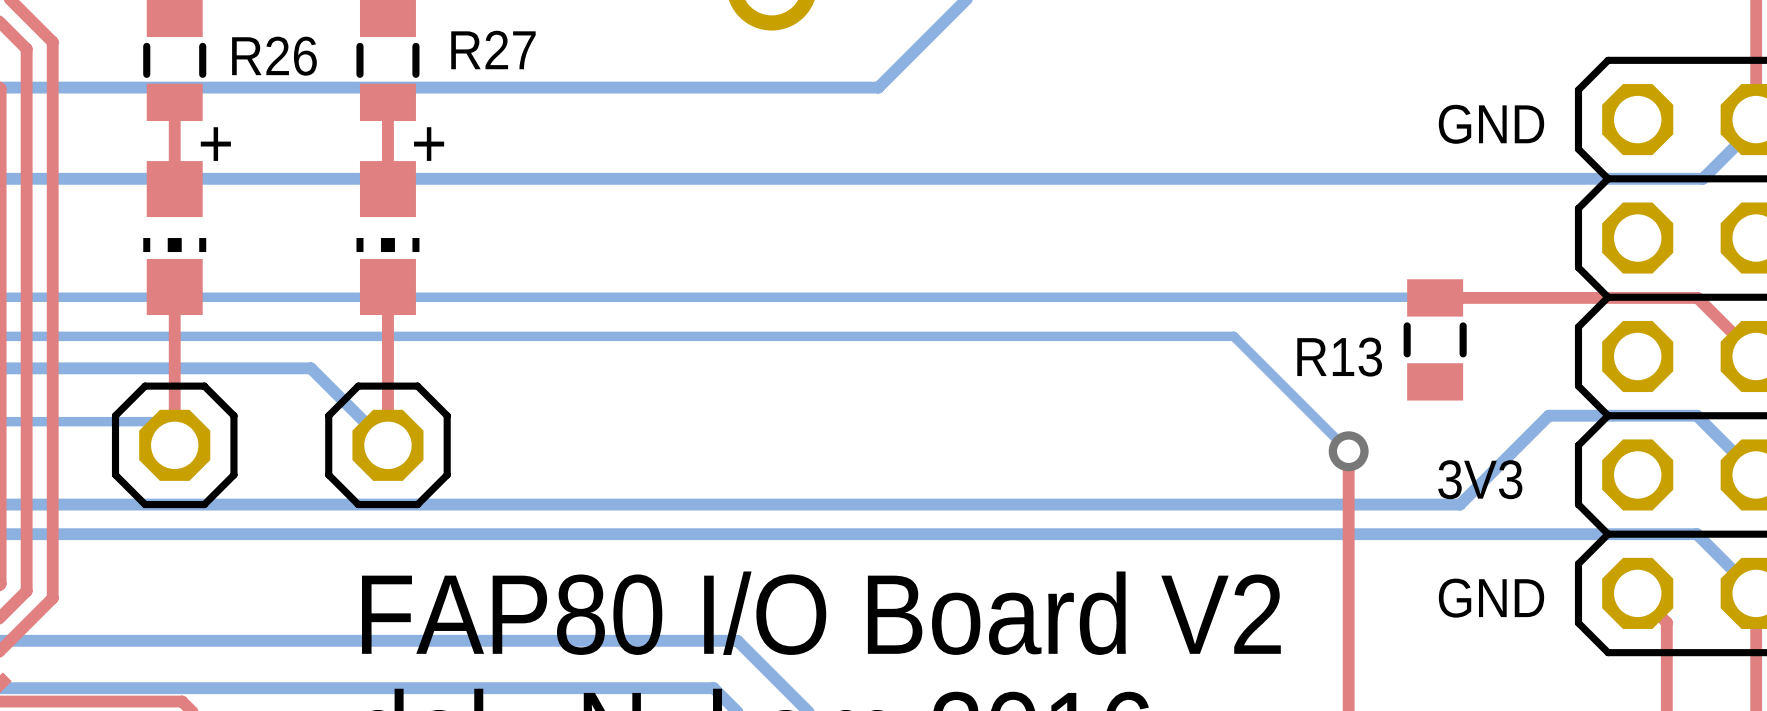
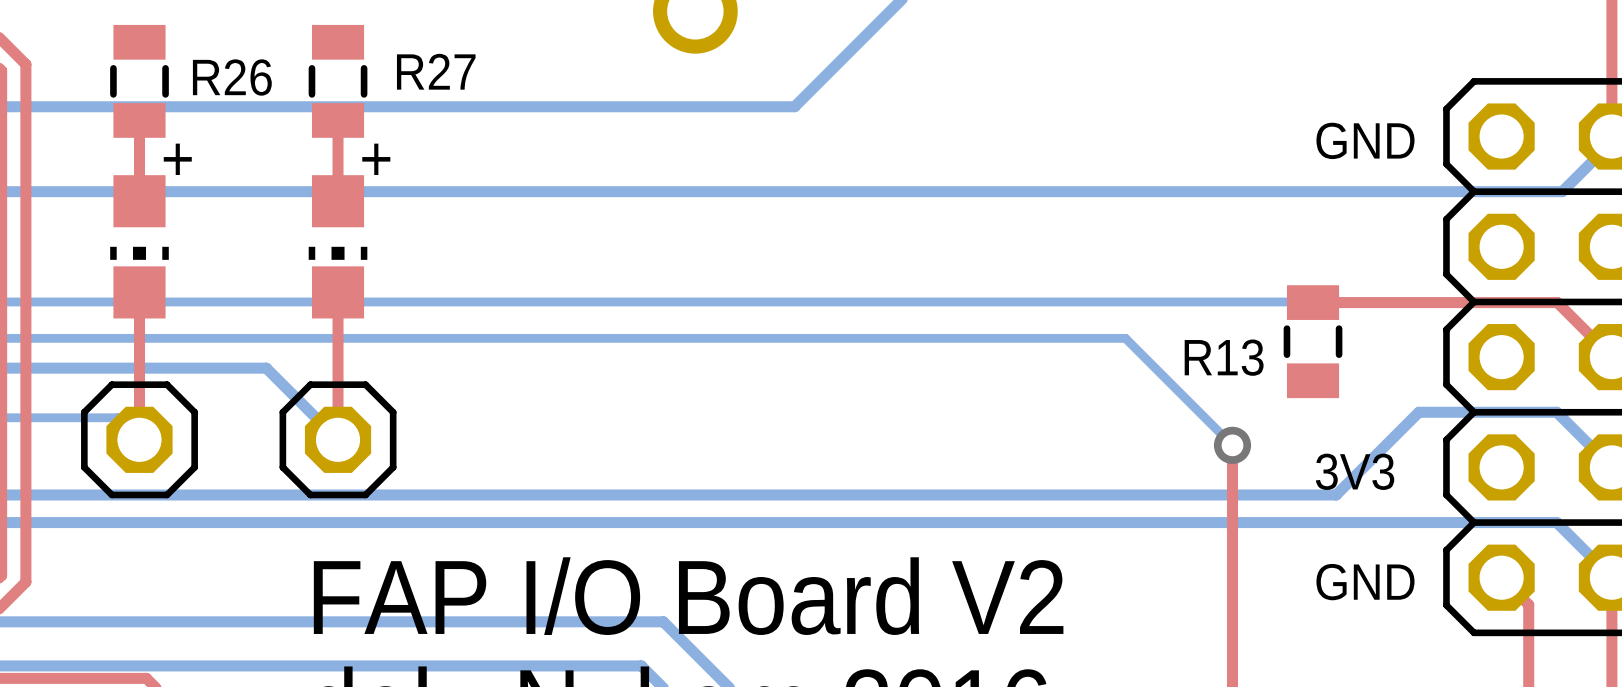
text: FAP80 I/O Board V2 (821, 613) -> FAP I/O Board V2 (688, 596)

